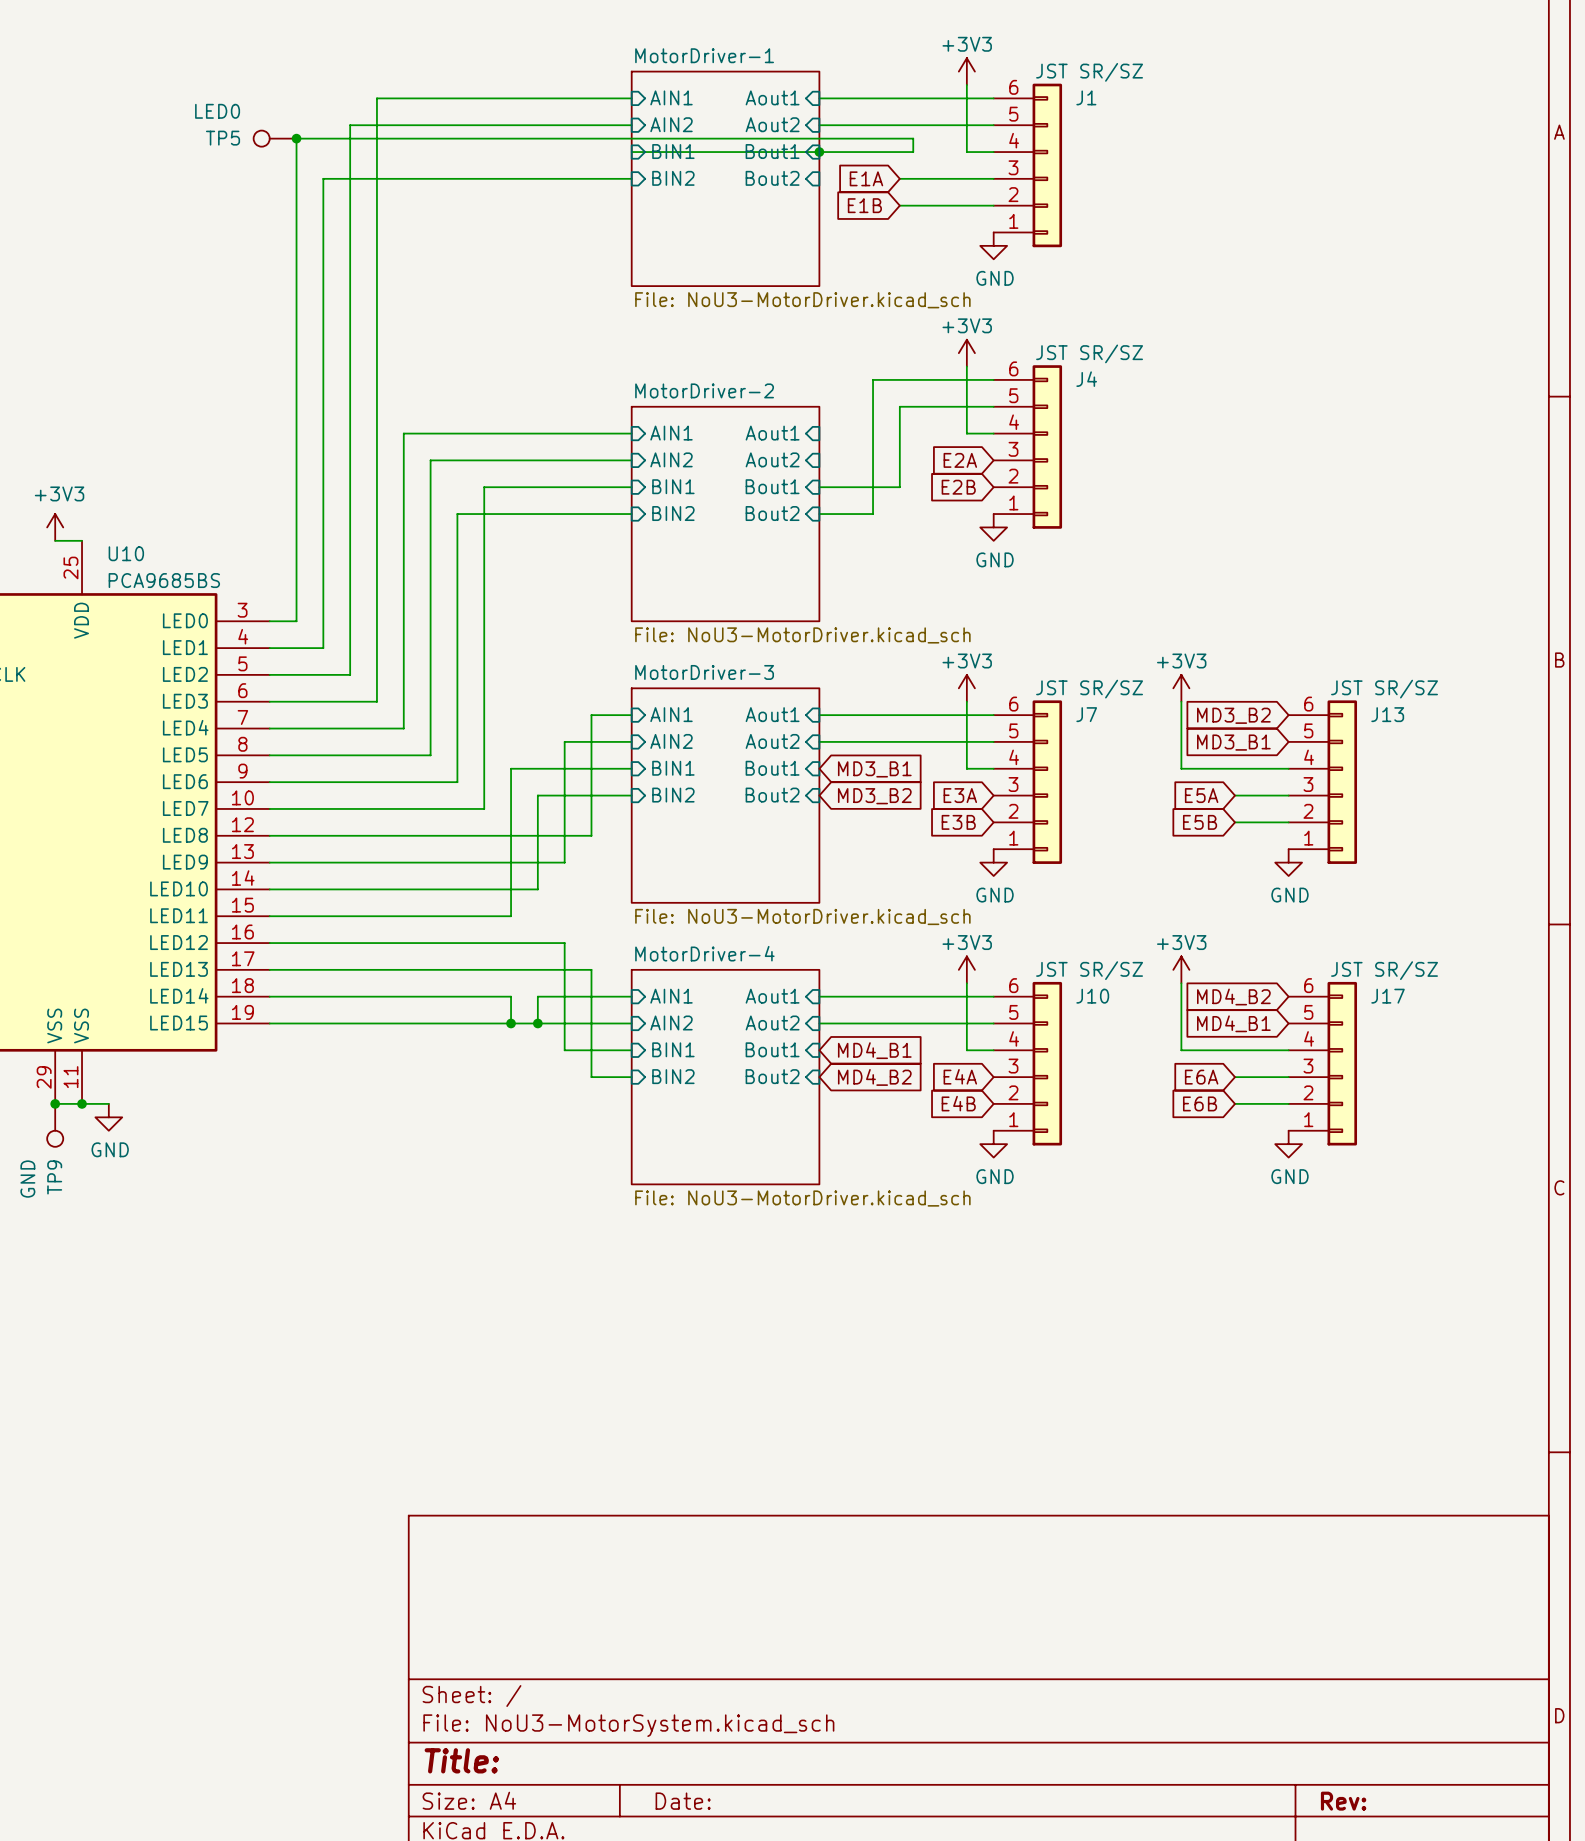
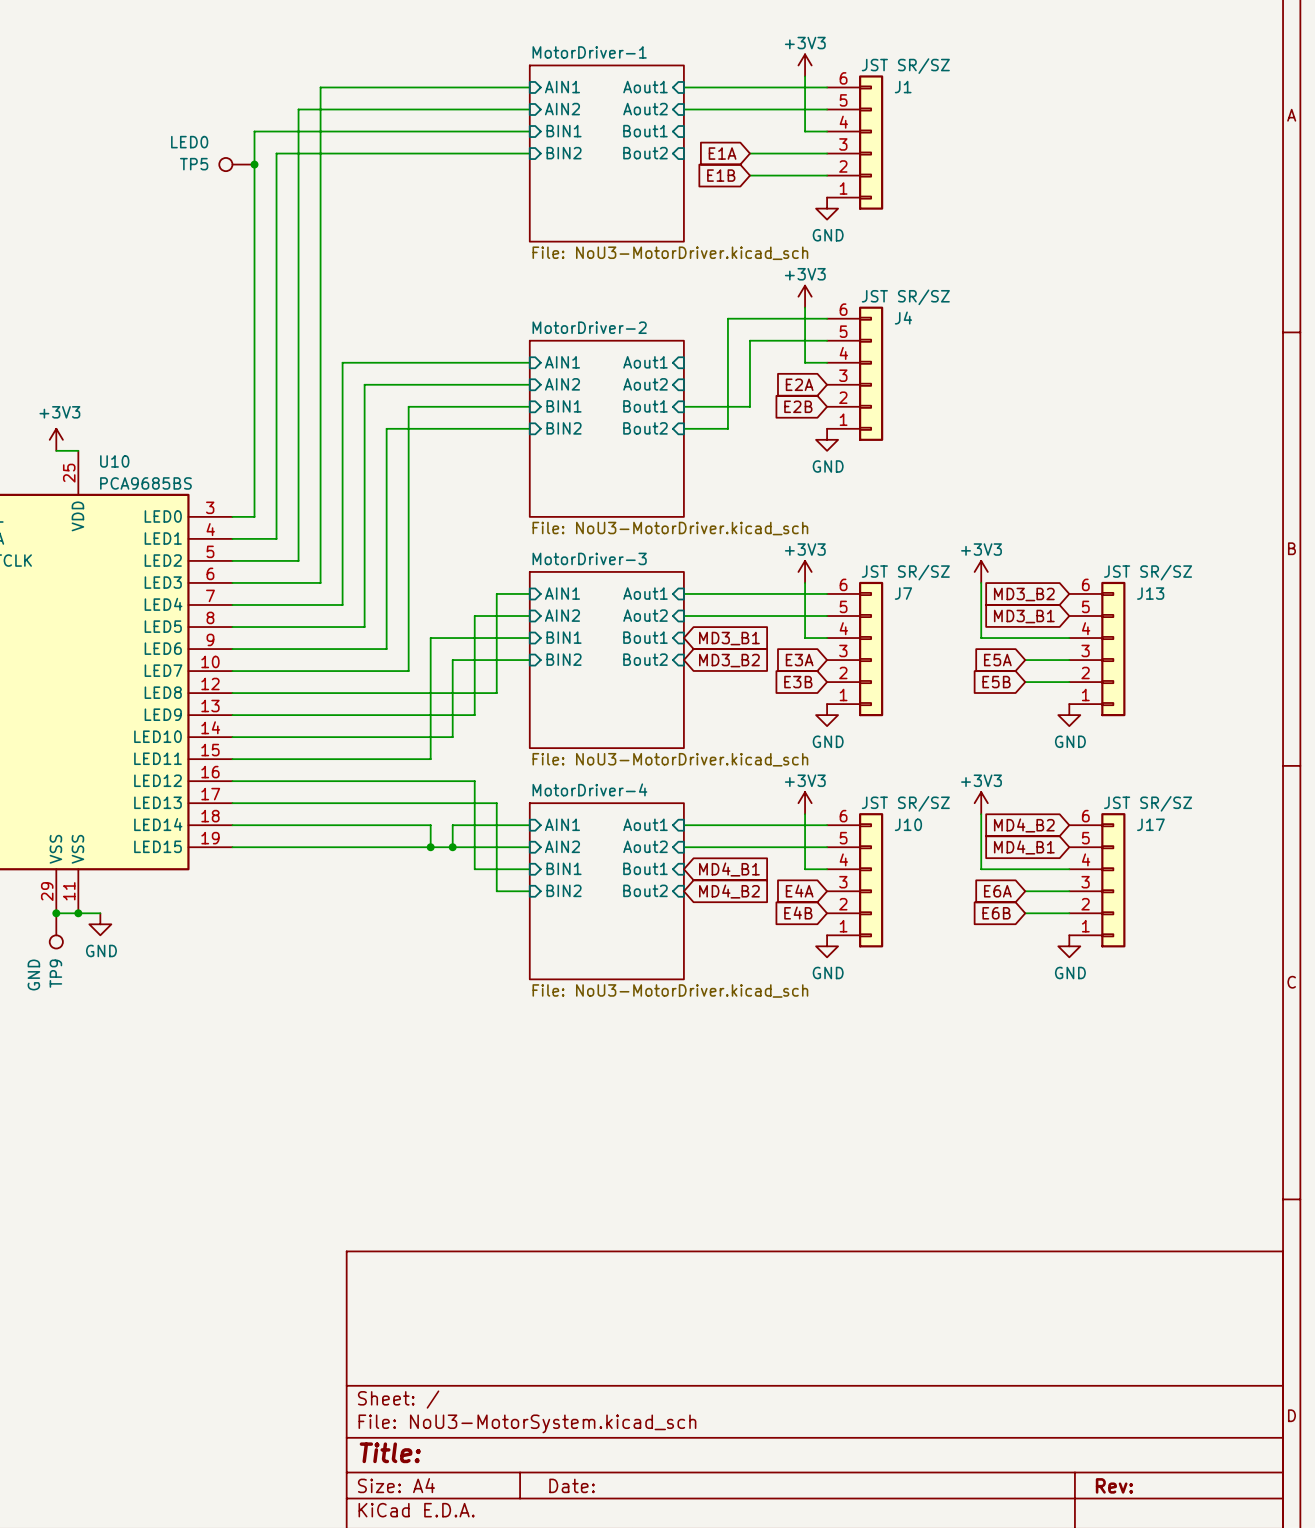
TP5 position: (275, 138) -> (236, 164)
junction position: (296, 138) -> (254, 164)
wire: (296, 152) (296, 138) (913, 138) (913, 152) (631, 152) -> (254, 131) (529, 131)
junction: (819, 152) -> none

